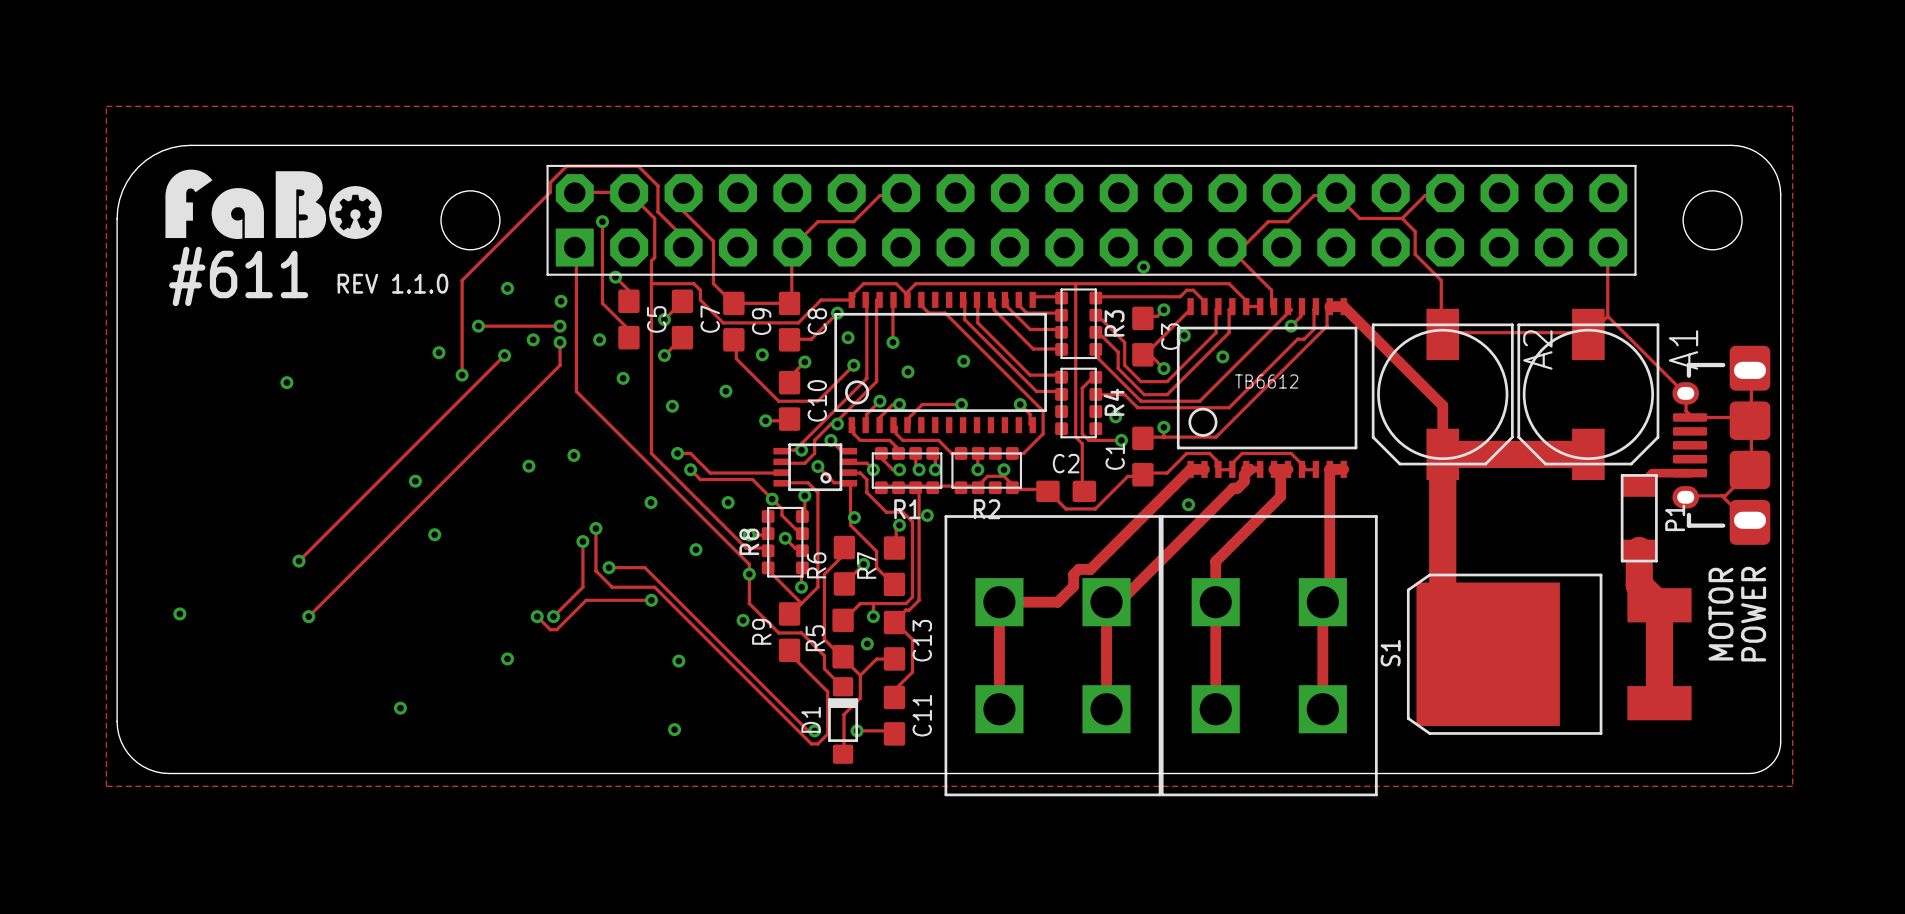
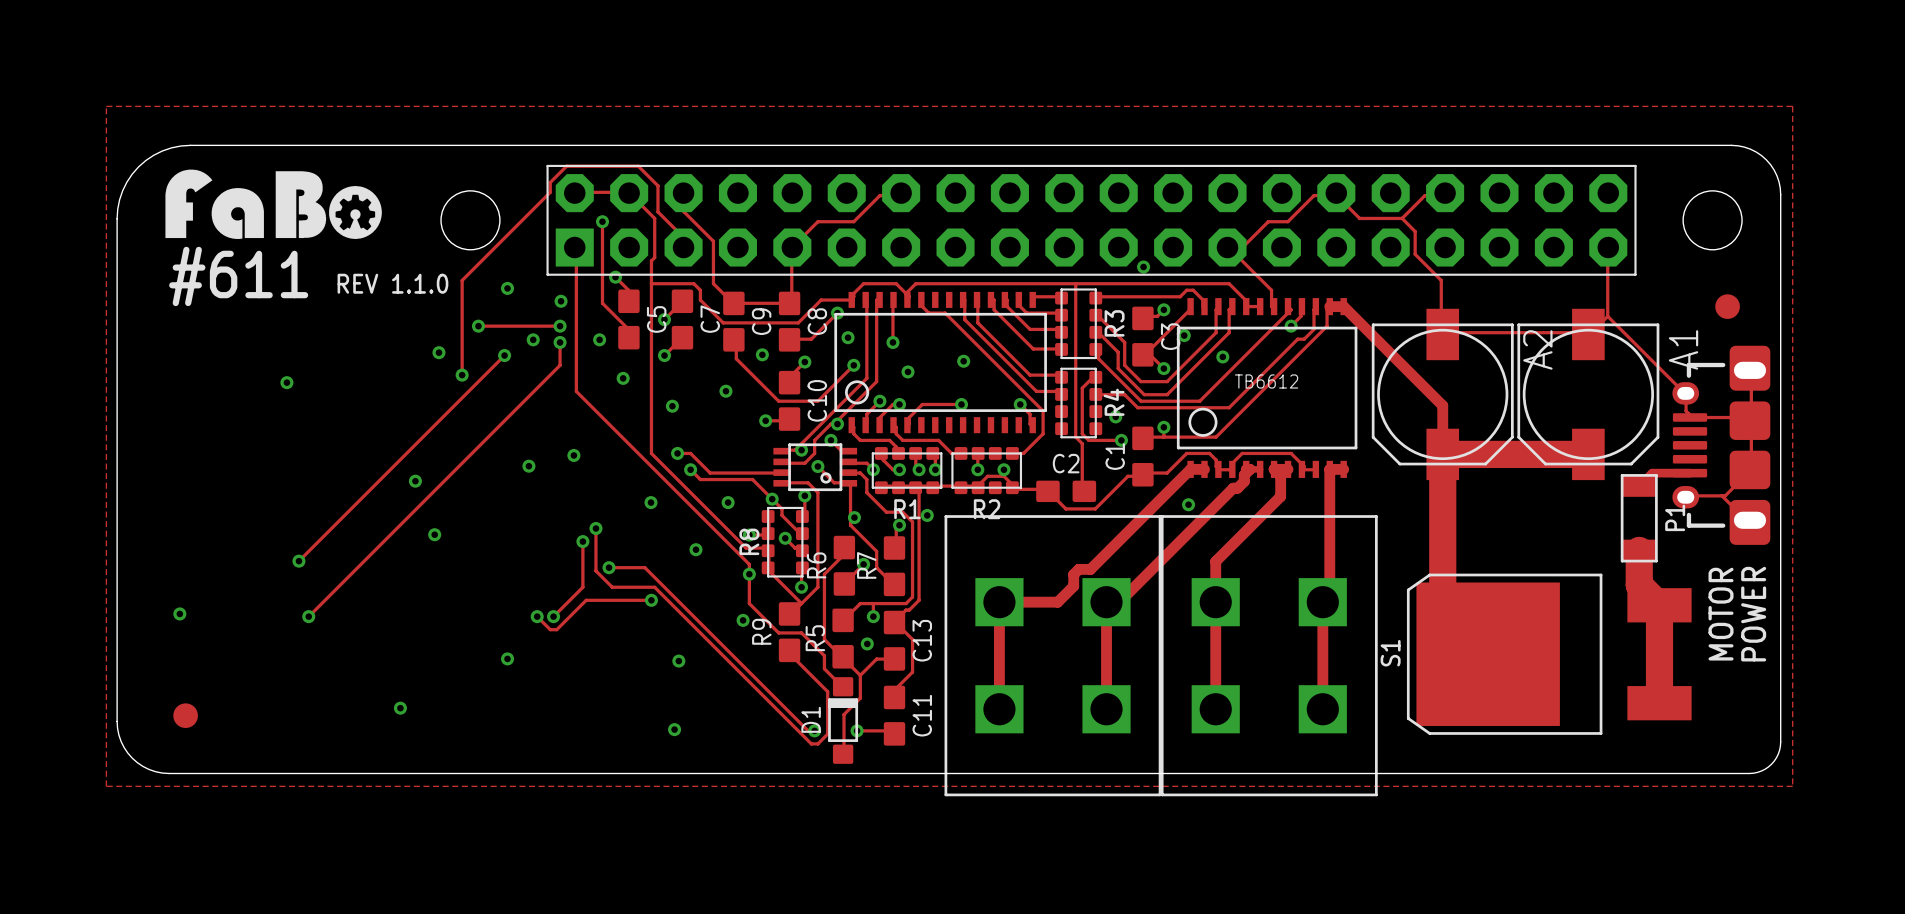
drawing: none -> [1715, 294, 1740, 319]
drawing: none -> [173, 703, 198, 728]

